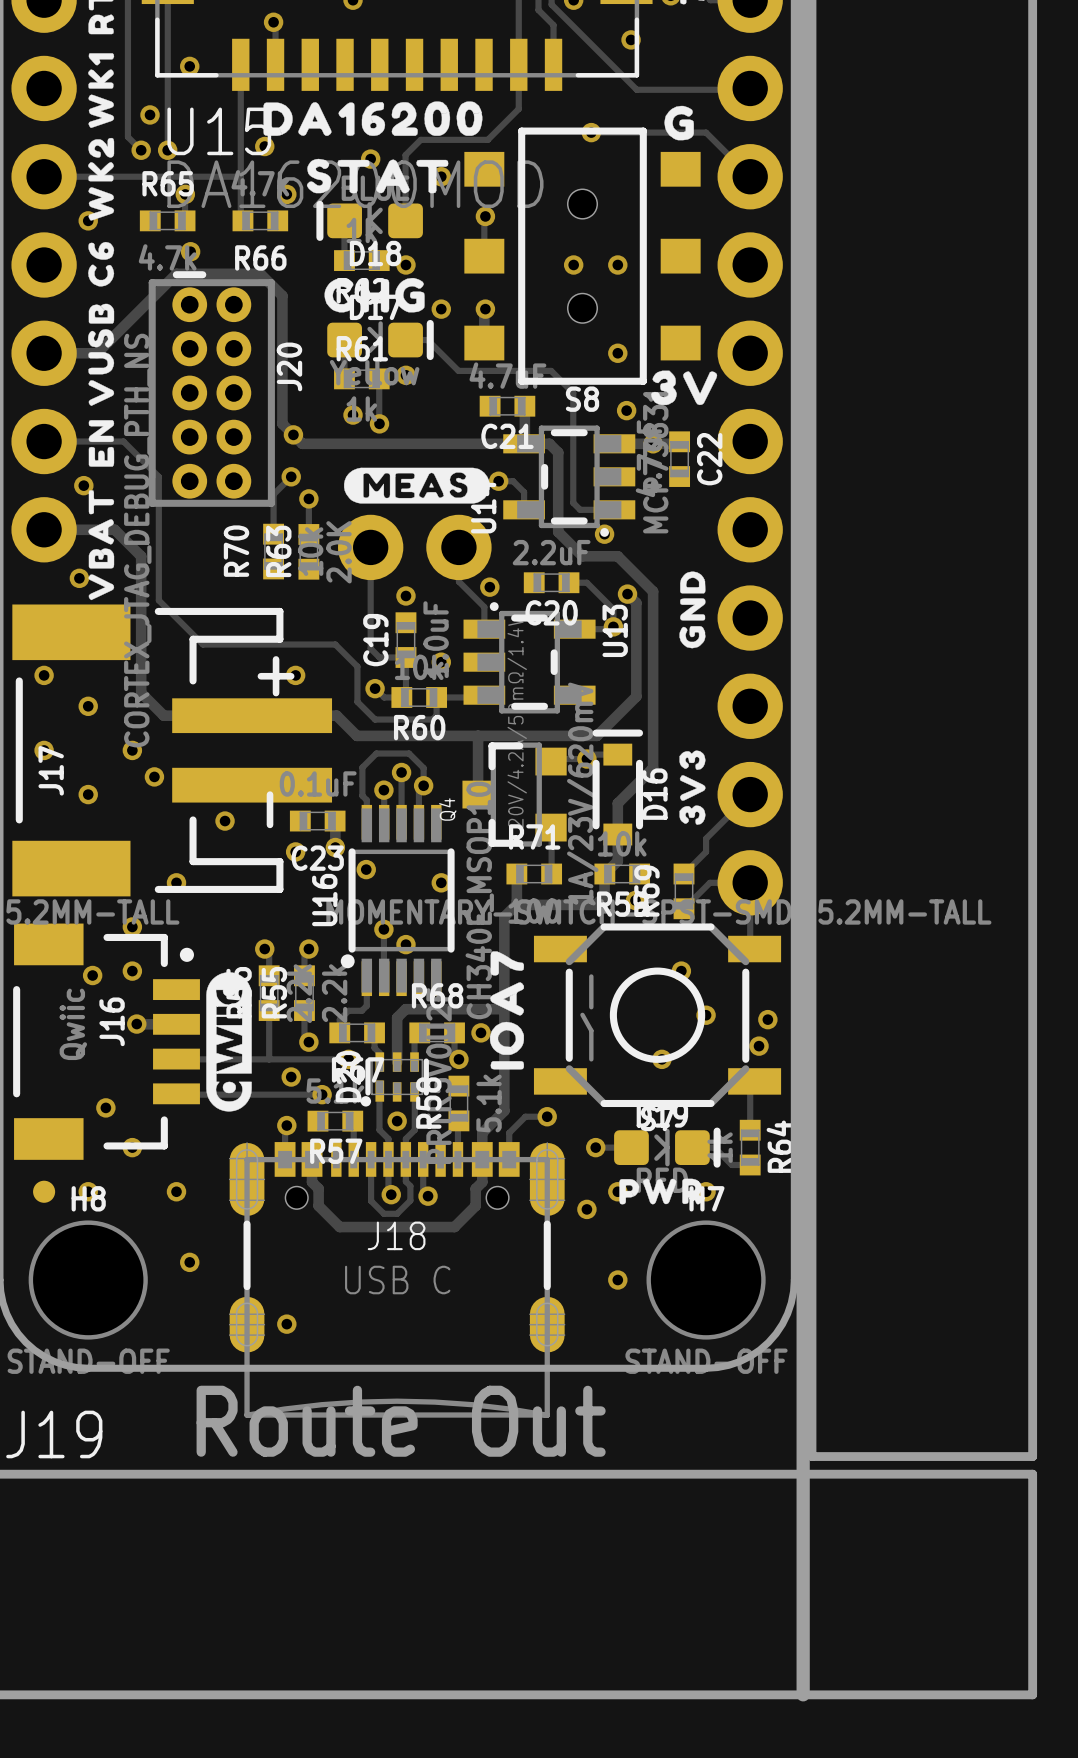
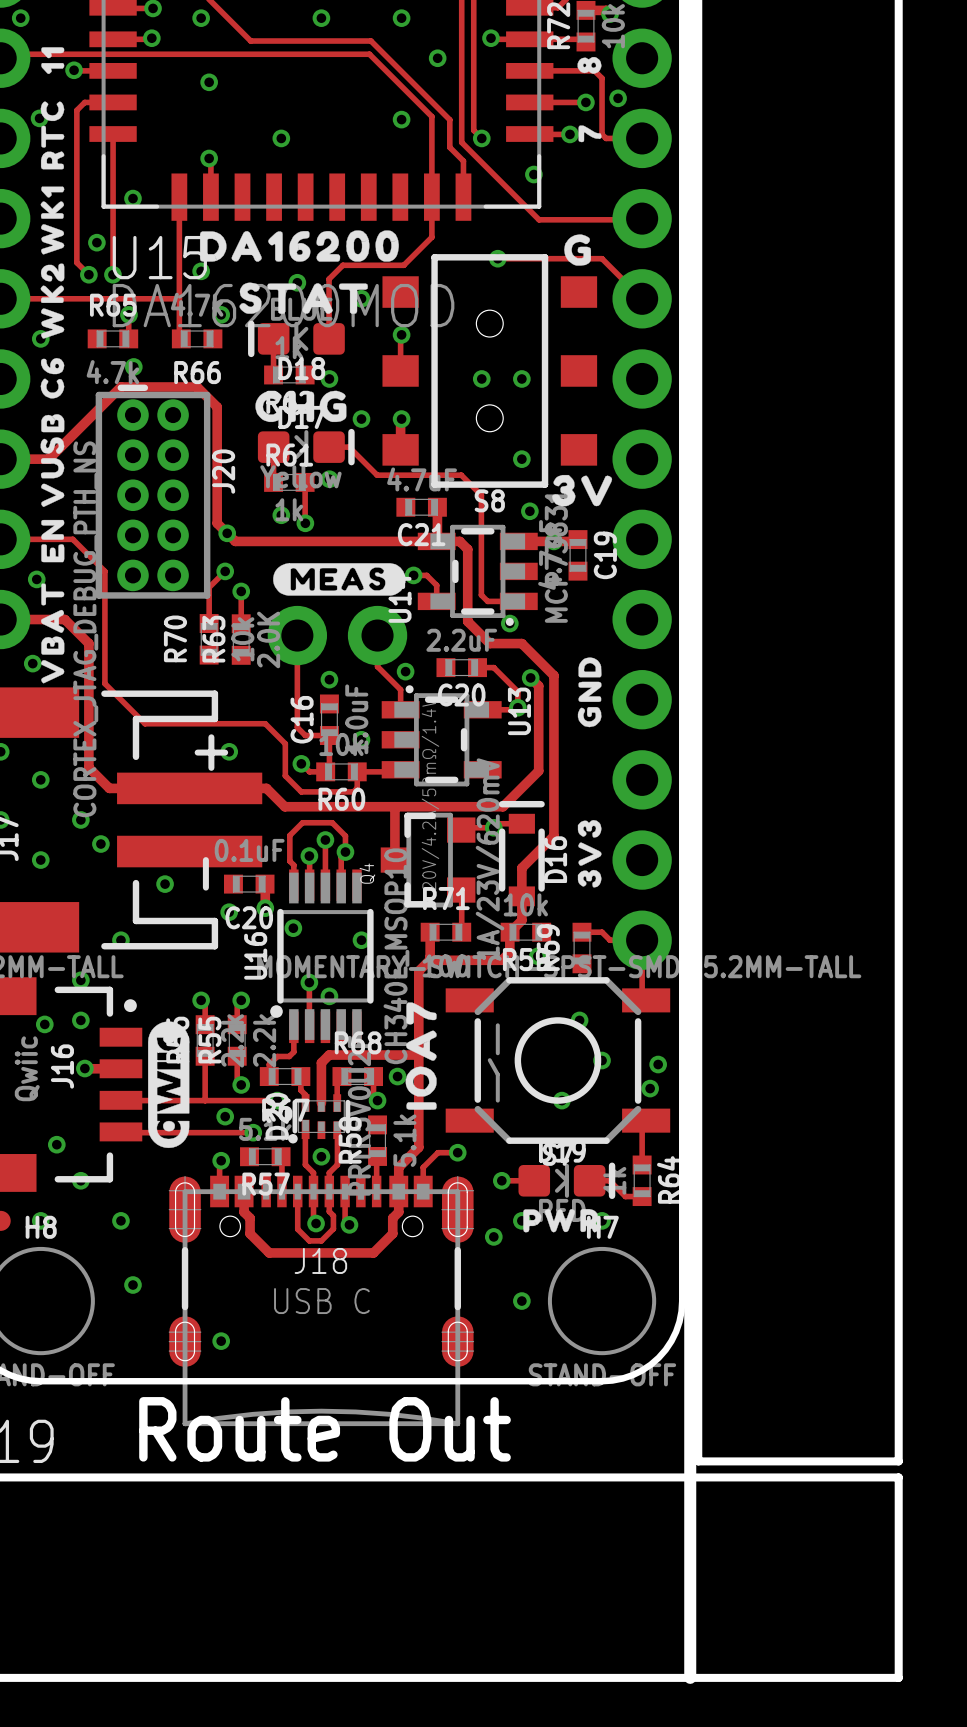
C22 name: C22 (709, 459) -> C19 (605, 555)
C19 name: C19 (375, 640) -> C16 (302, 719)
track: (750, 794) (706, 838) (706, 851) (684, 874) -> none
C23 name: C23 (317, 858) -> C20 (249, 917)
track: (714, 882) (709, 882) (684, 908) -> (610, 940) (602, 932) (581, 932)

